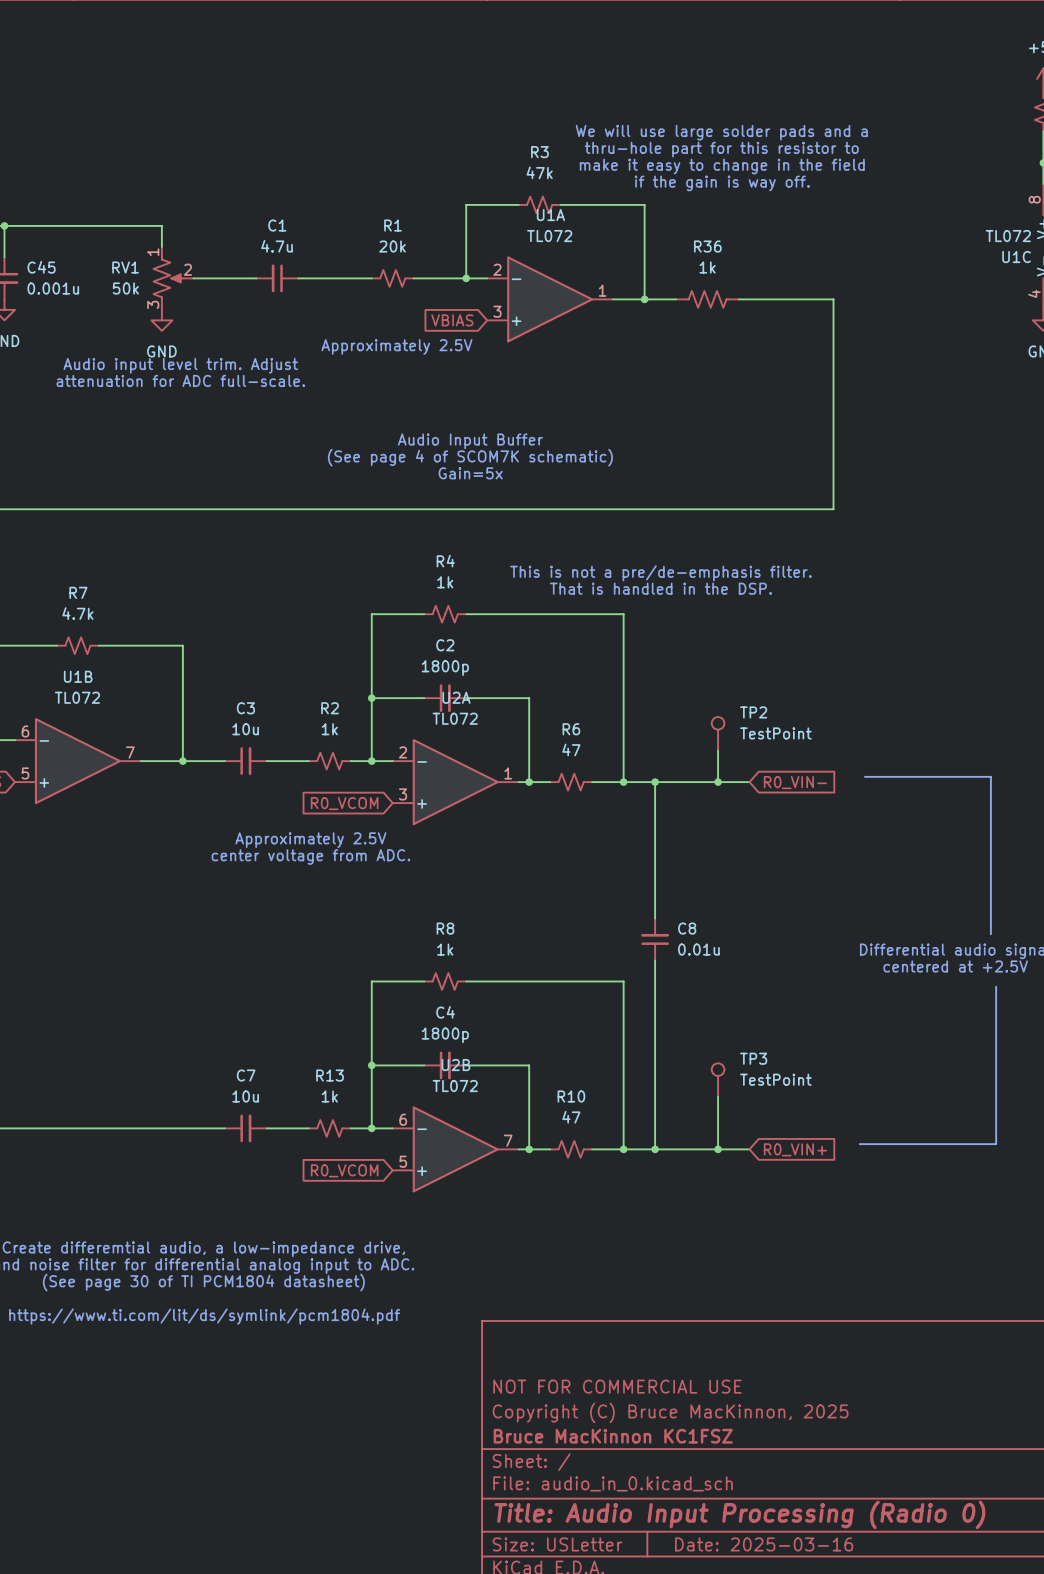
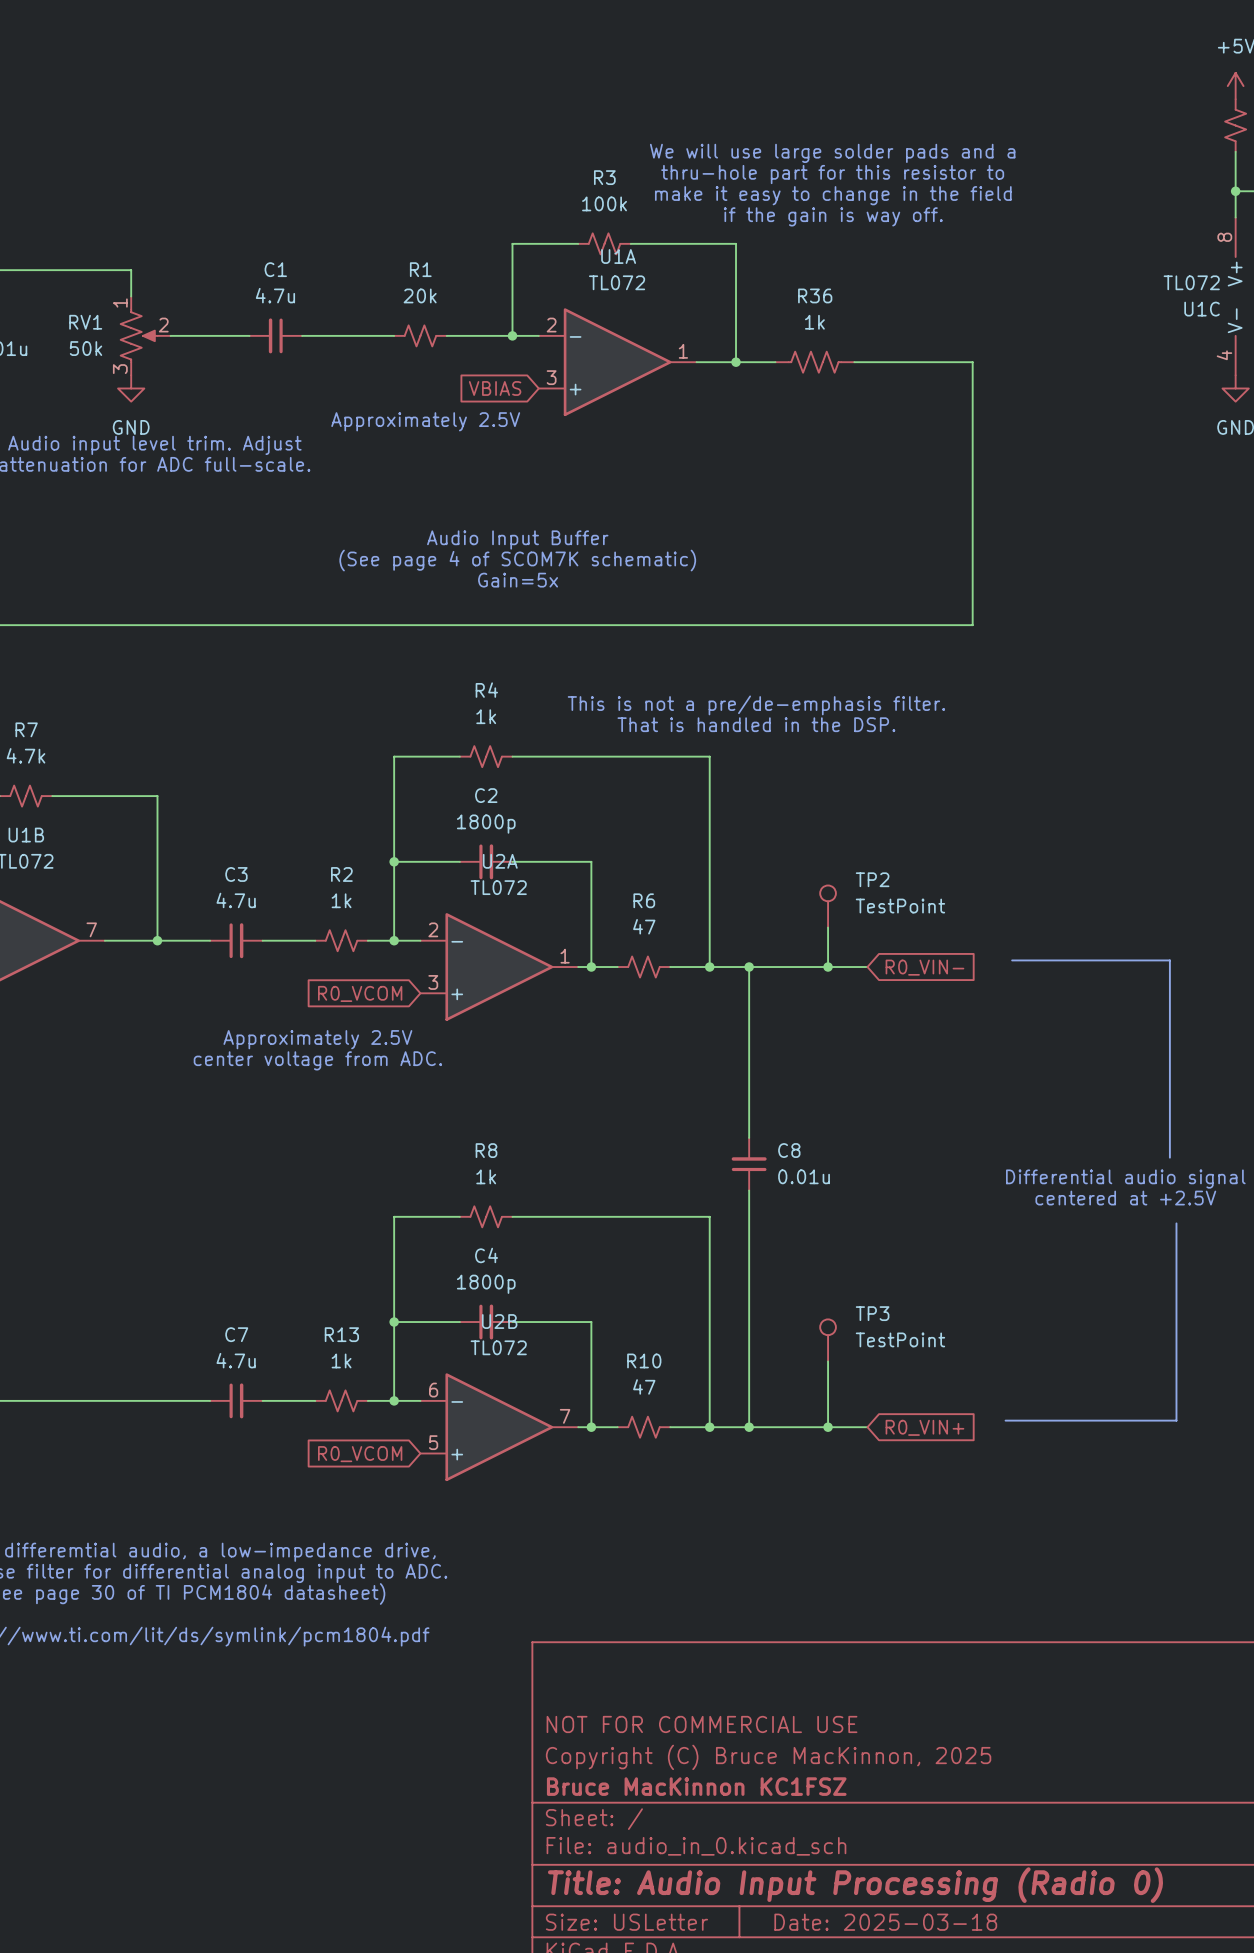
R3 value: 47k (539, 172) -> 100k (604, 203)
C3 value: 10u (245, 729) -> 4.7u (236, 900)
C7 value: 10u (245, 1096) -> 4.7u (236, 1360)
title block: Date: 2025-03-16 (764, 1544) -> Date: 2025-03-18 (885, 1922)

